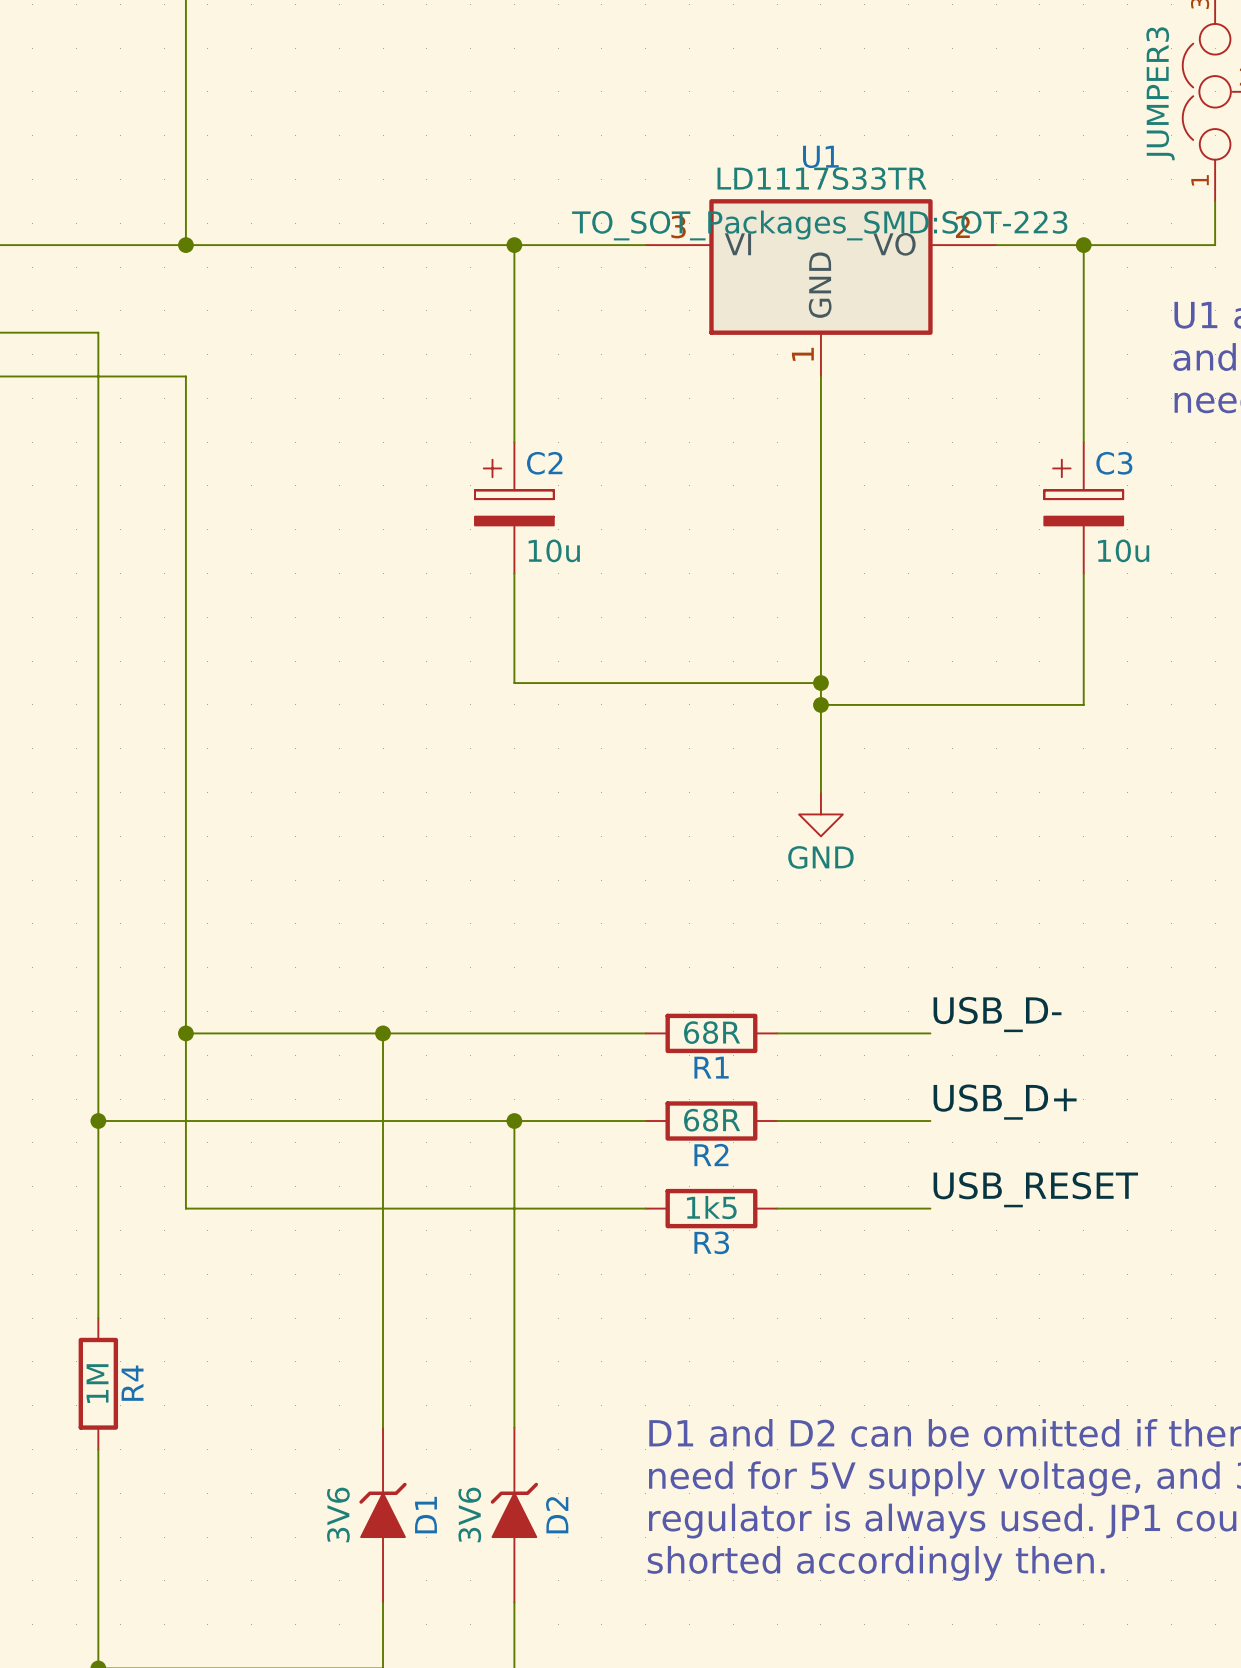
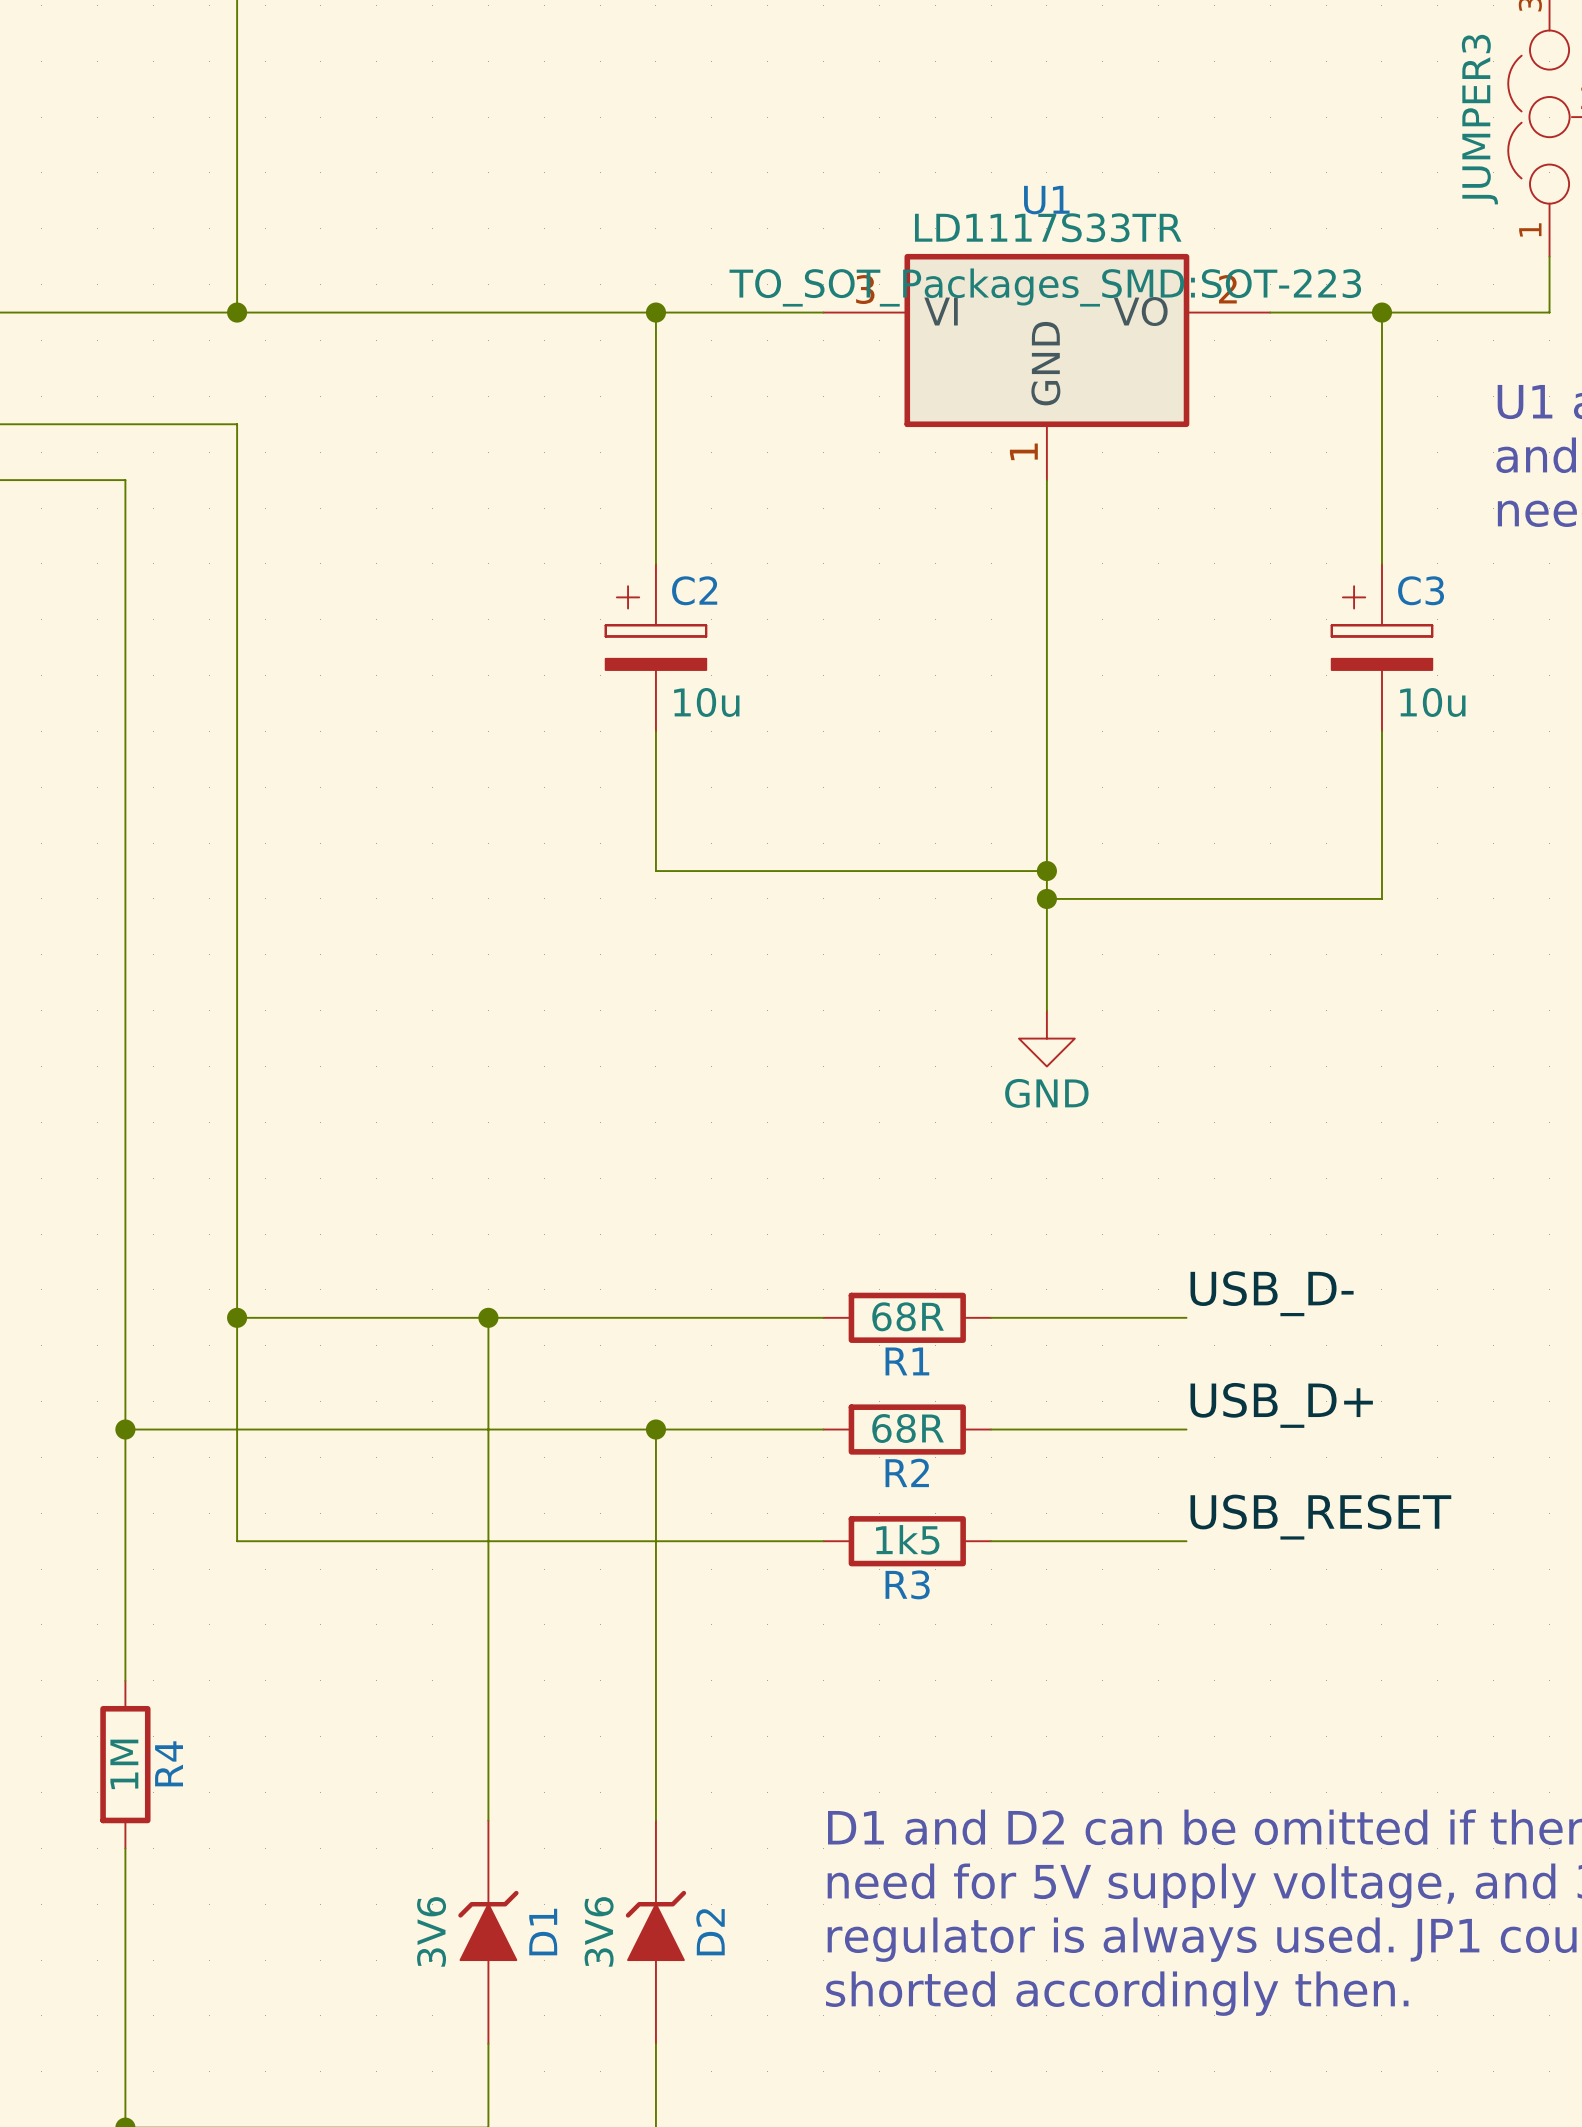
wire: (98, 332) (98, 376) (185, 376) -> (125, 424) (237, 424) (237, 480)

